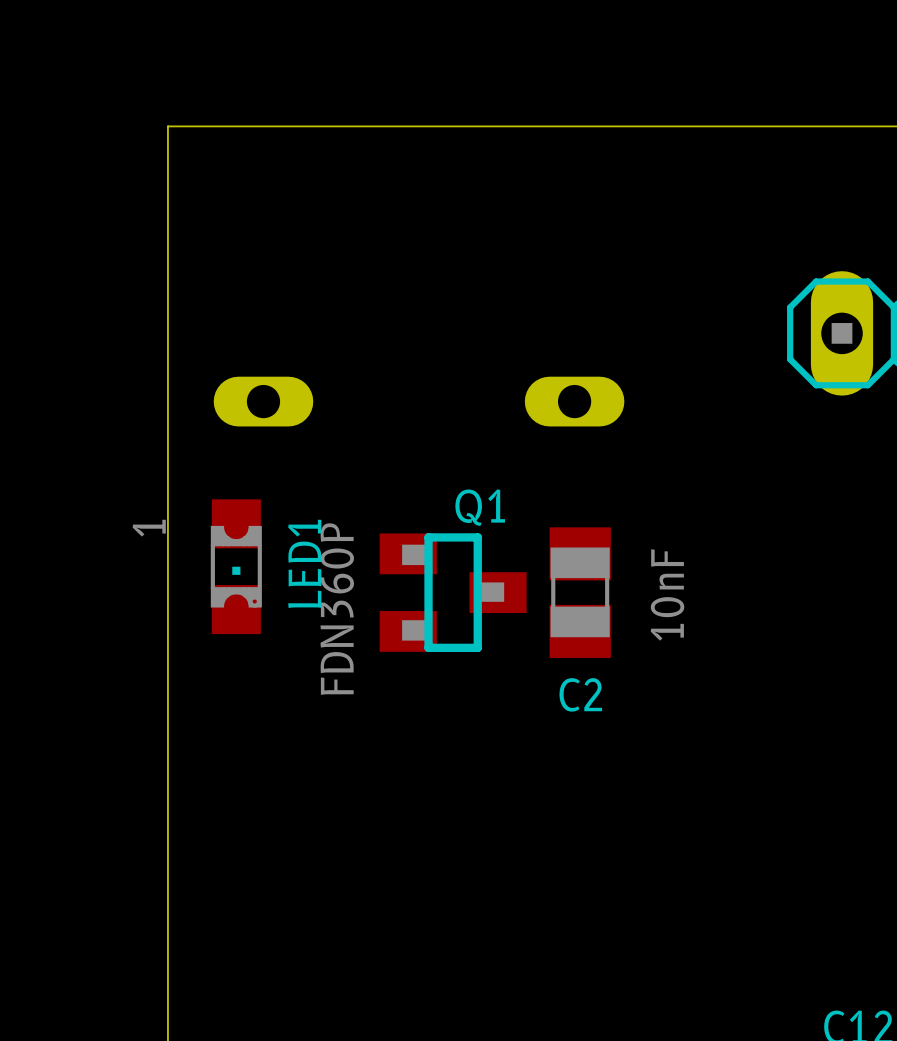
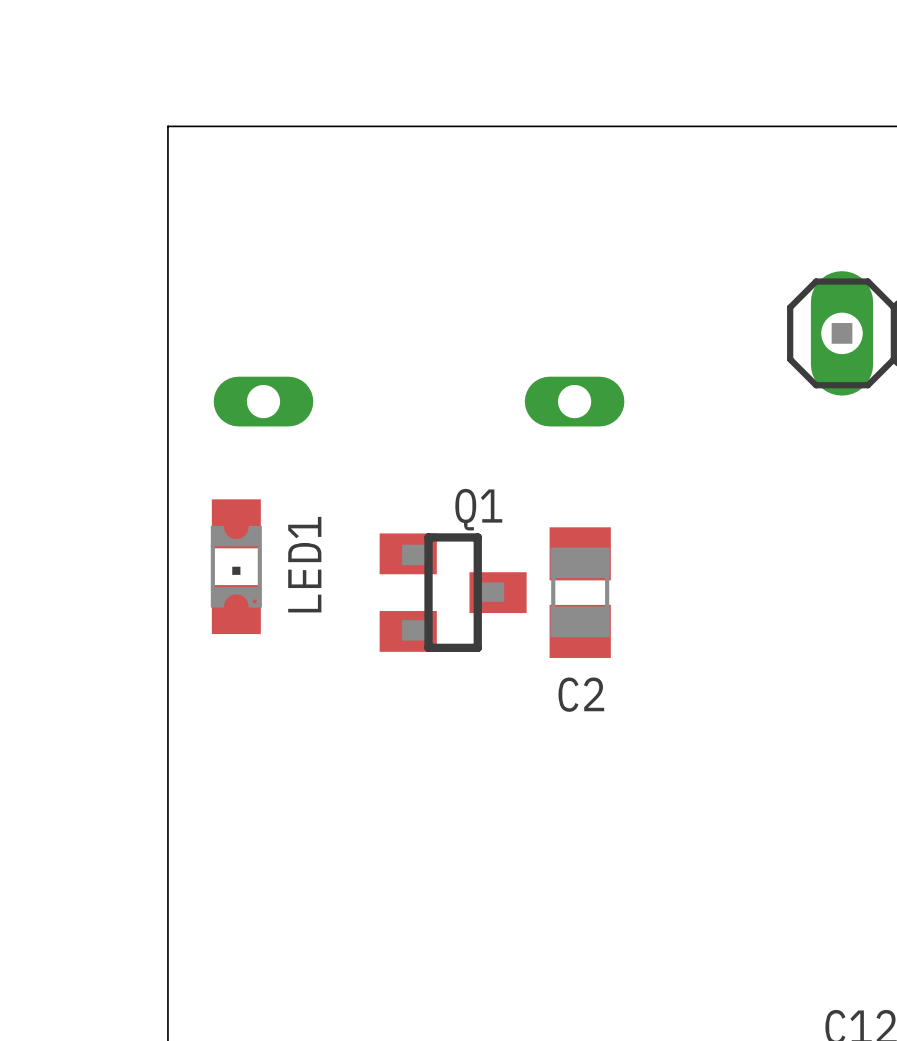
LED1 value: 1 (149, 528) -> none
C2 value: 10nF (667, 594) -> none
Q1 value: FDN360P (337, 609) -> none

